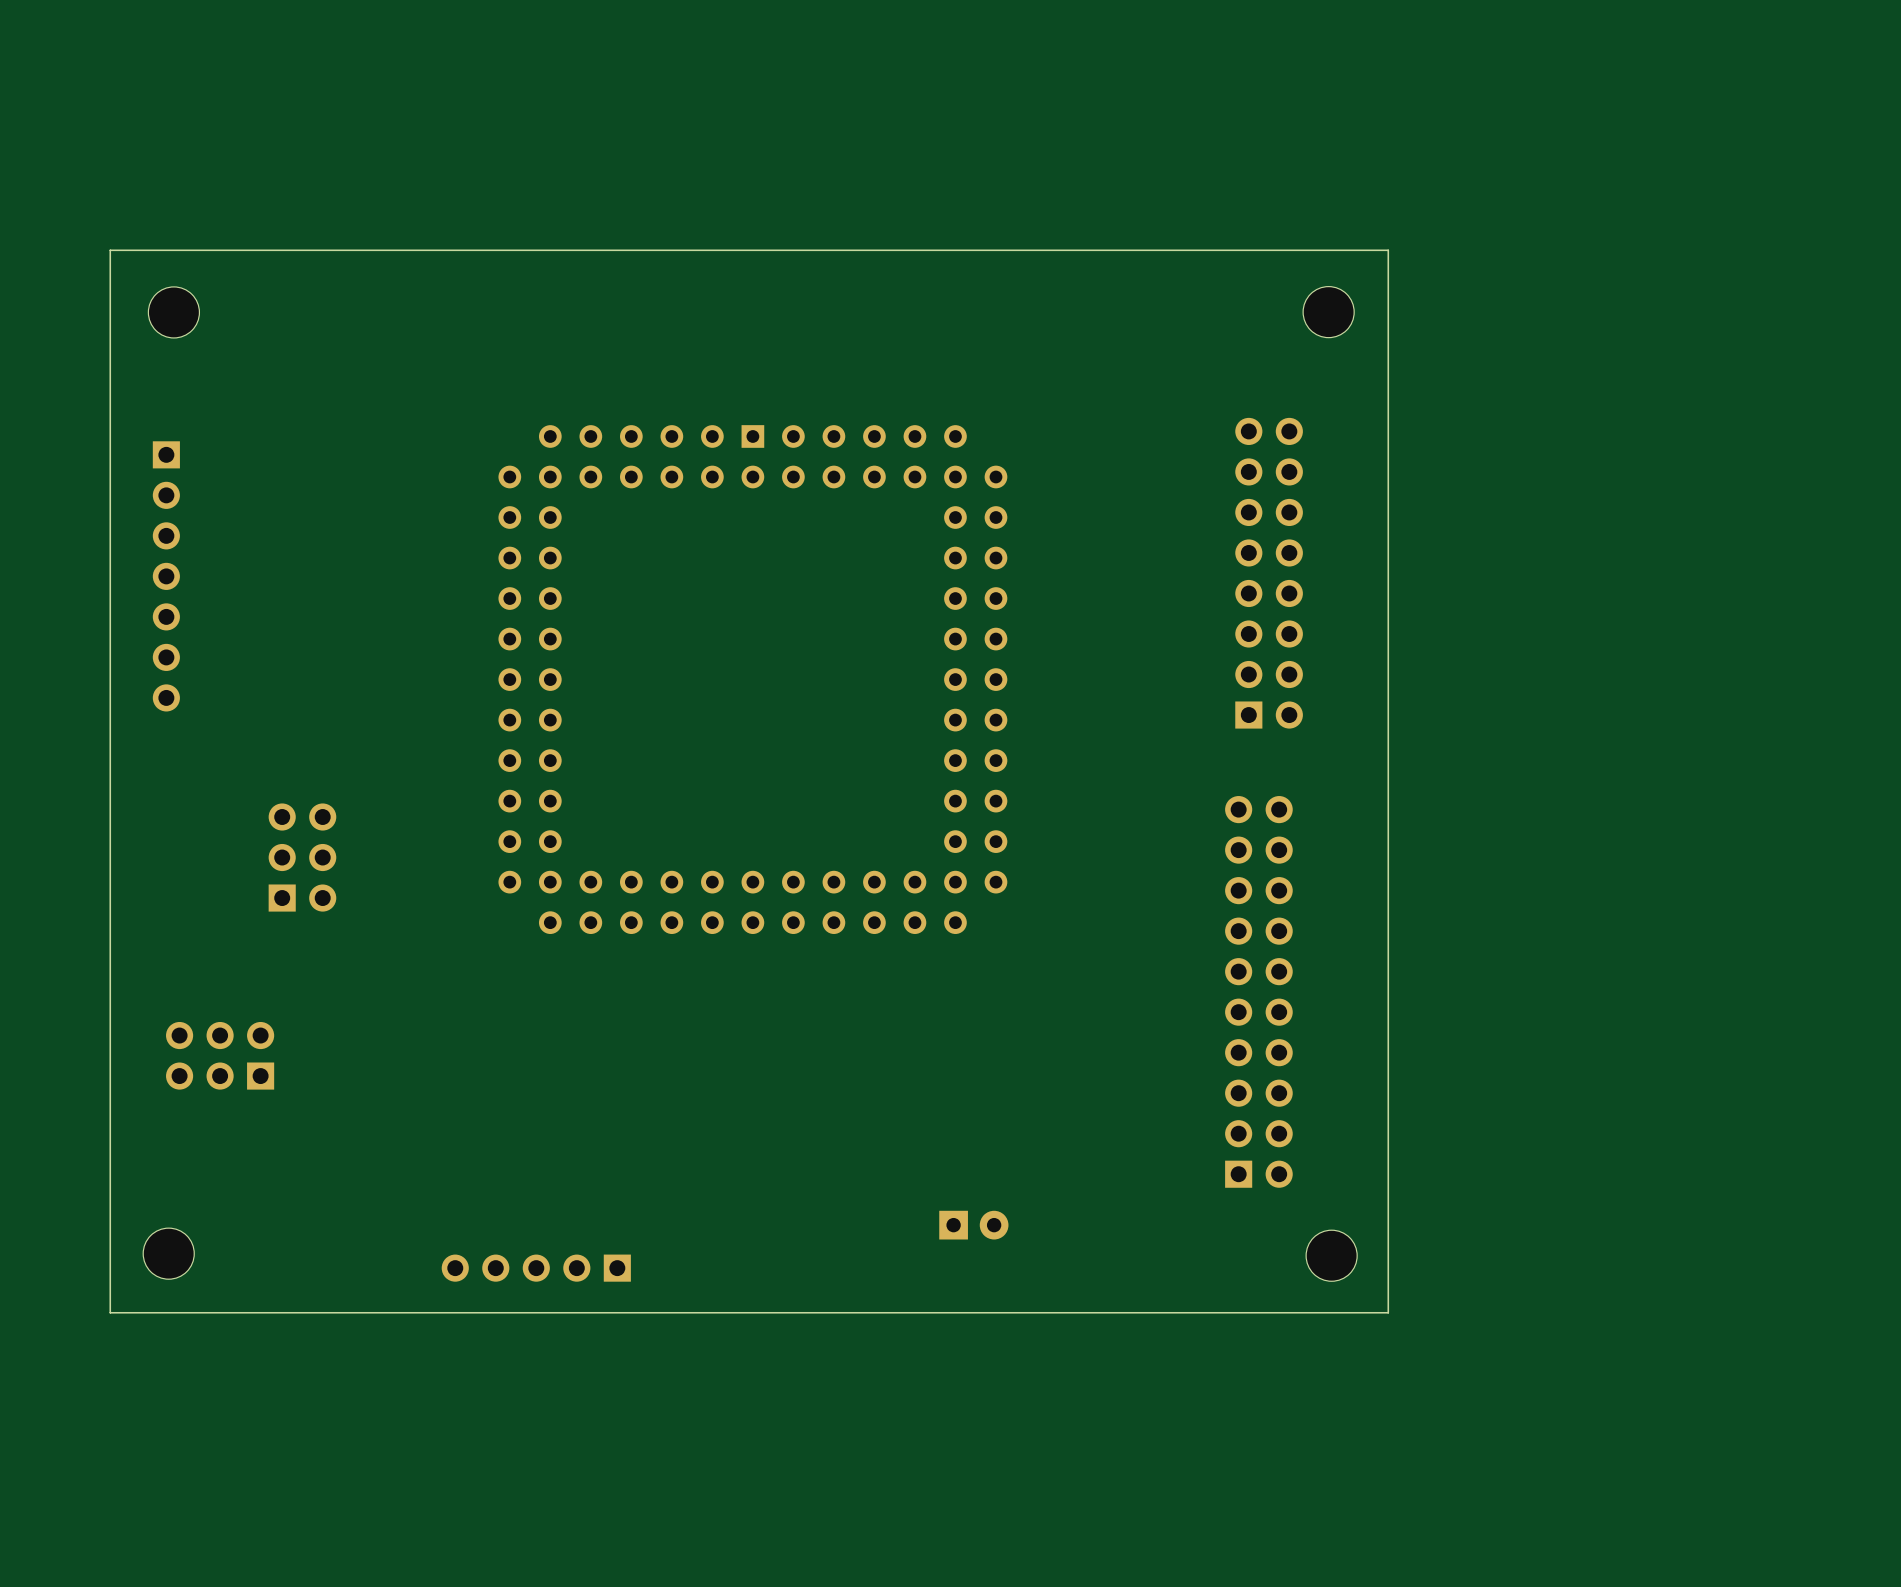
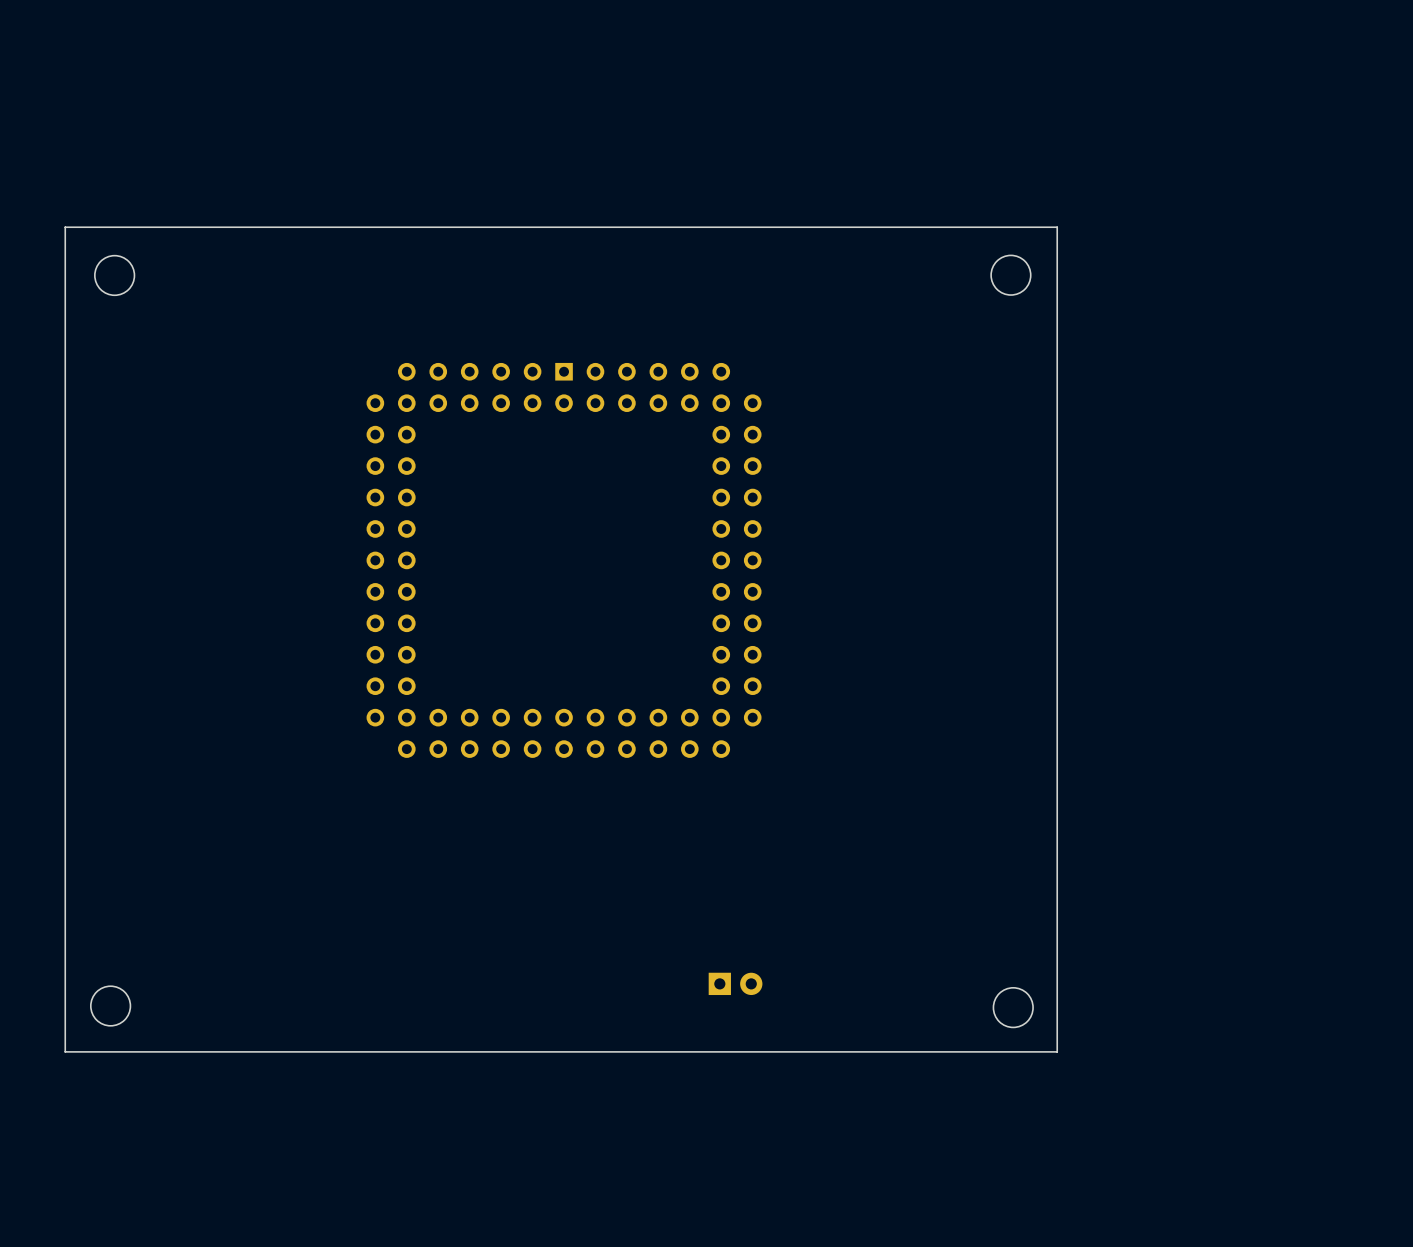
part: (1269, 573) -> none
part: (166, 576) -> none
part: (302, 857) -> none
part: (1258, 991) -> none
part: (220, 1055) -> none
part: (536, 1268) -> none

